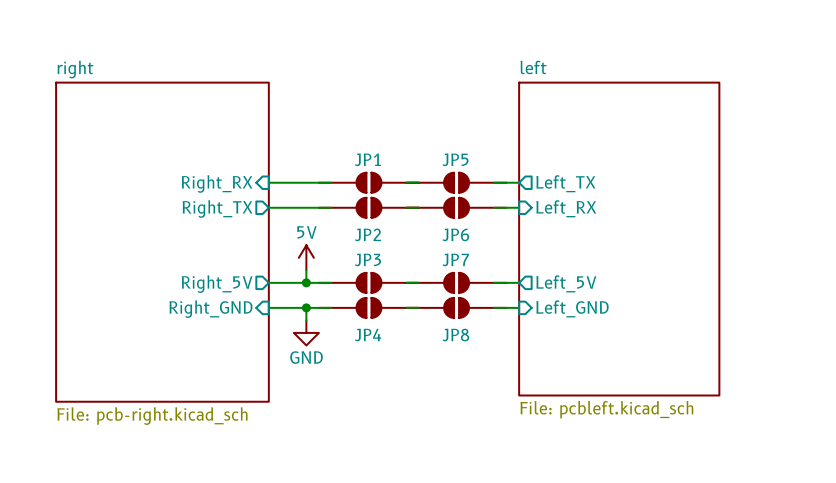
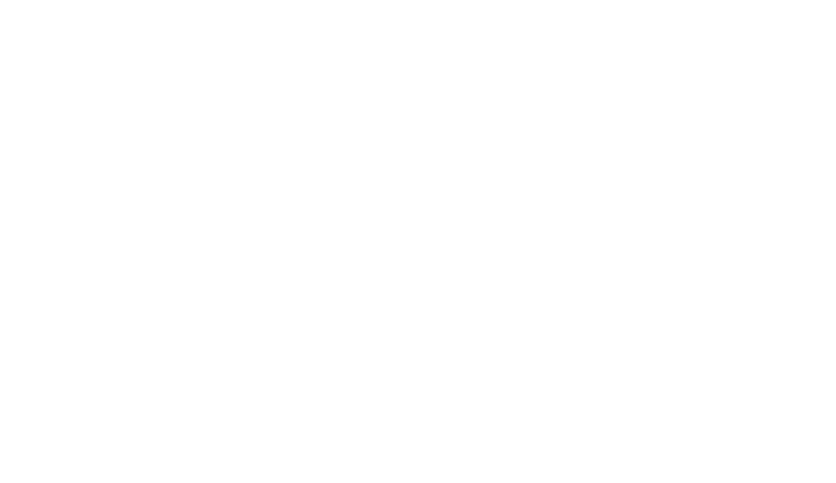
wire: (268, 182) (331, 182) -> none
JP1: (368, 182) -> none
wire: (406, 182) (419, 182) -> none
JP5: (456, 182) -> none
wire: (494, 182) (519, 182) -> none
sheet pin: Right_RX (217, 183) -> none
sheet pin: Left_TX (565, 183) -> none
wire: (268, 207) (331, 207) -> none
JP2: (368, 207) -> none
wire: (406, 207) (419, 207) -> none
JP6: (456, 207) -> none
wire: (494, 207) (519, 207) -> none
sheet pin: Left_RX (566, 208) -> none
sheet pin: Right_TX (217, 209) -> none
sheet left: File: pcbleft.kicad_sch (619, 239) -> none
sheet right: File: pcb-right.kicad_sch (162, 242) -> none
power symbol: 5V (306, 257) -> none
wire: (306, 270) (306, 282) -> none
wire: (268, 282) (331, 282) -> none
junction: (306, 282) -> none
JP3: (368, 282) -> none
wire: (406, 282) (419, 282) -> none
JP7: (456, 282) -> none
wire: (494, 282) (519, 282) -> none
sheet pin: Left_5V (566, 283) -> none
sheet pin: Right_5V (217, 284) -> none
wire: (268, 307) (331, 307) -> none
wire: (306, 307) (306, 320) -> none
junction: (306, 307) -> none
JP4: (368, 307) -> none
wire: (406, 307) (419, 307) -> none
JP8: (456, 307) -> none
wire: (494, 307) (519, 307) -> none
sheet pin: Left_GND (572, 308) -> none
sheet pin: Right_GND (210, 309) -> none
power symbol: GND (306, 332) -> none

